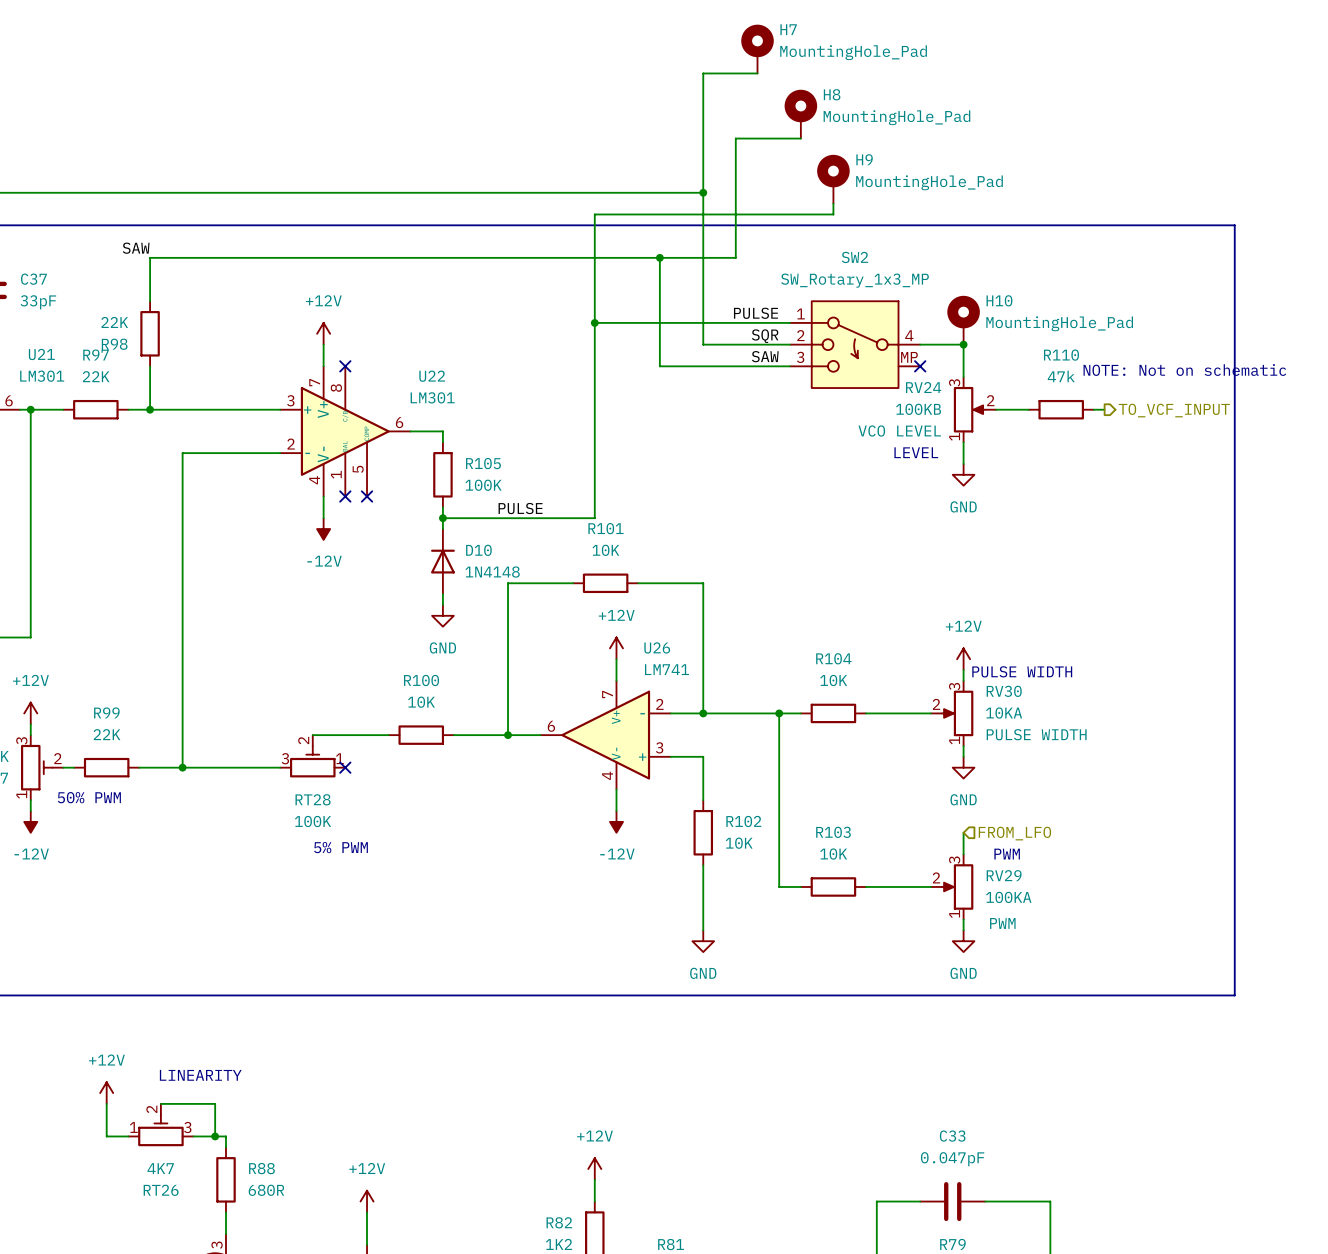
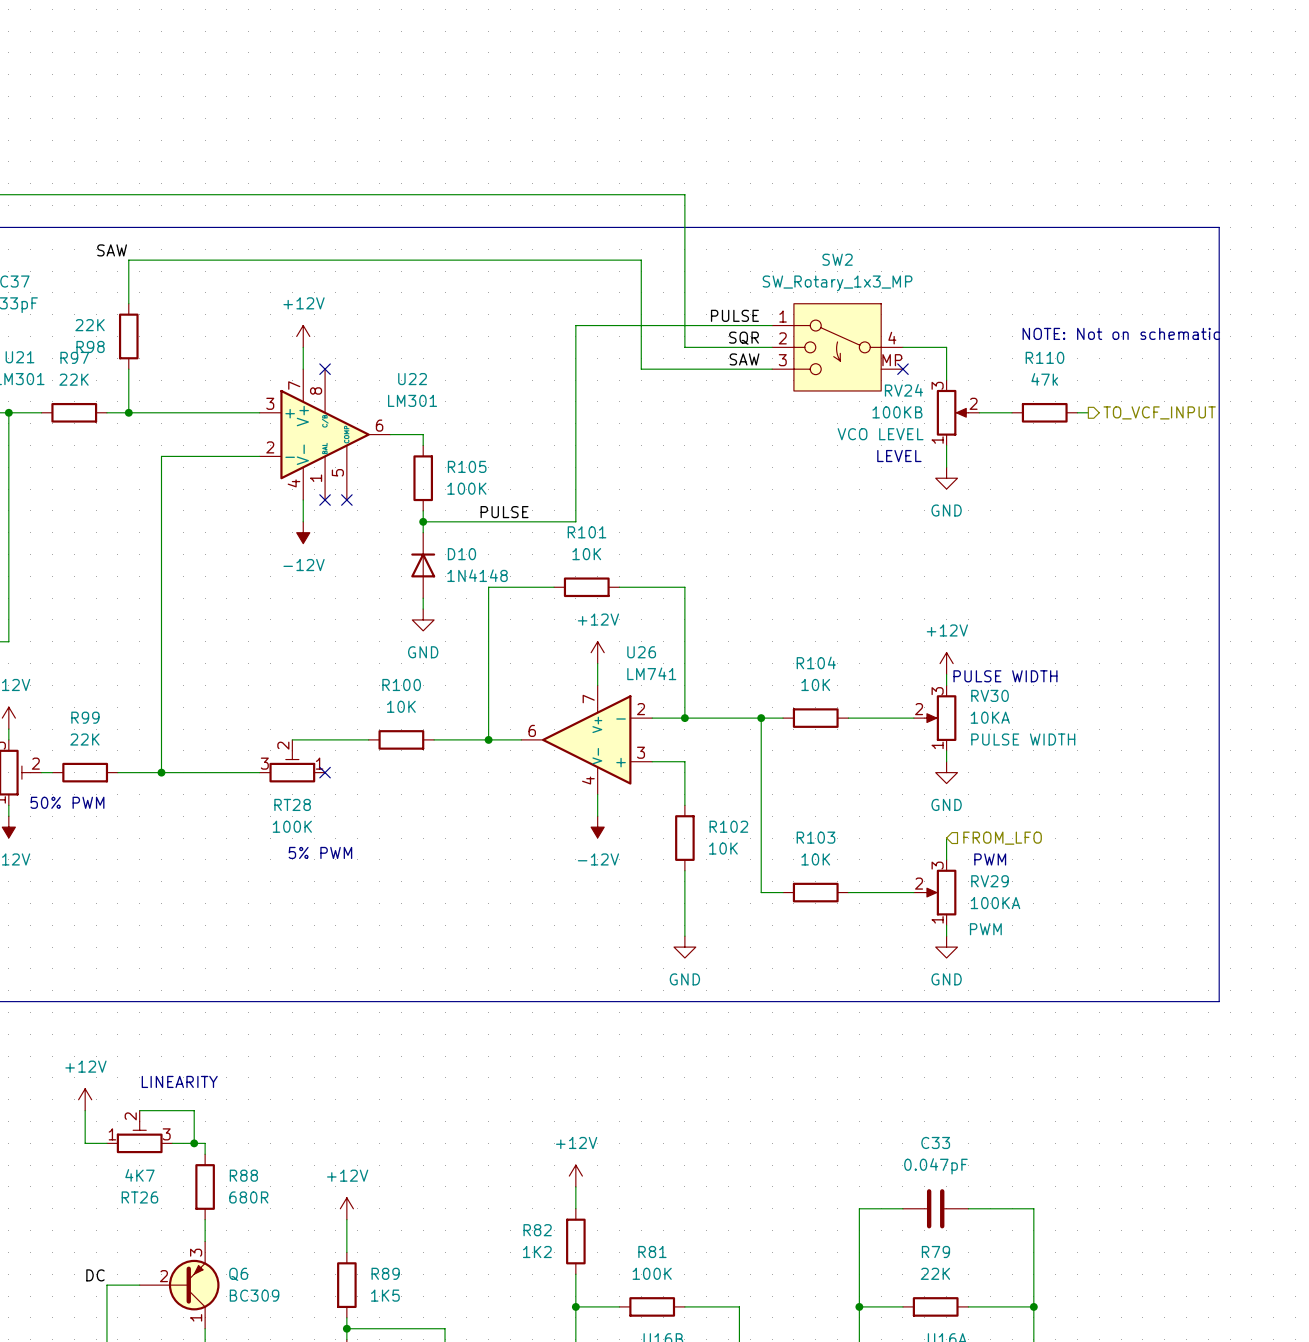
H7: MountingHole_Pad (757, 49) -> none
wire: (757, 73) (703, 73) (703, 192) -> none
H8: MountingHole_Pad (800, 114) -> none
wire: (800, 138) (735, 138) (735, 257) (659, 257) -> none
H9: MountingHole_Pad (833, 179) -> none
junction: (703, 192) -> none
wire: (833, 203) (833, 214) (594, 214) (594, 322) -> none
junction: (659, 257) -> none
H10: MountingHole_Pad (963, 320) -> none
junction: (594, 322) -> none
junction: (963, 344) -> none
text position: NOTE: Not on schematic (1184, 370) -> NOTE: Not on schematic (1121, 333)

